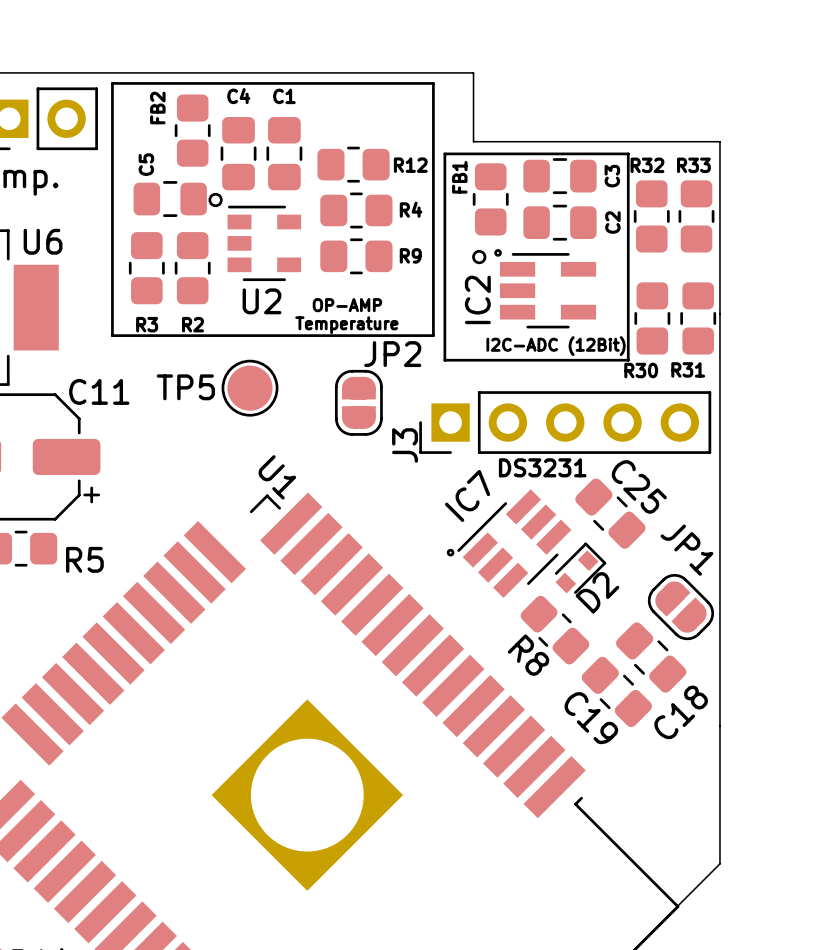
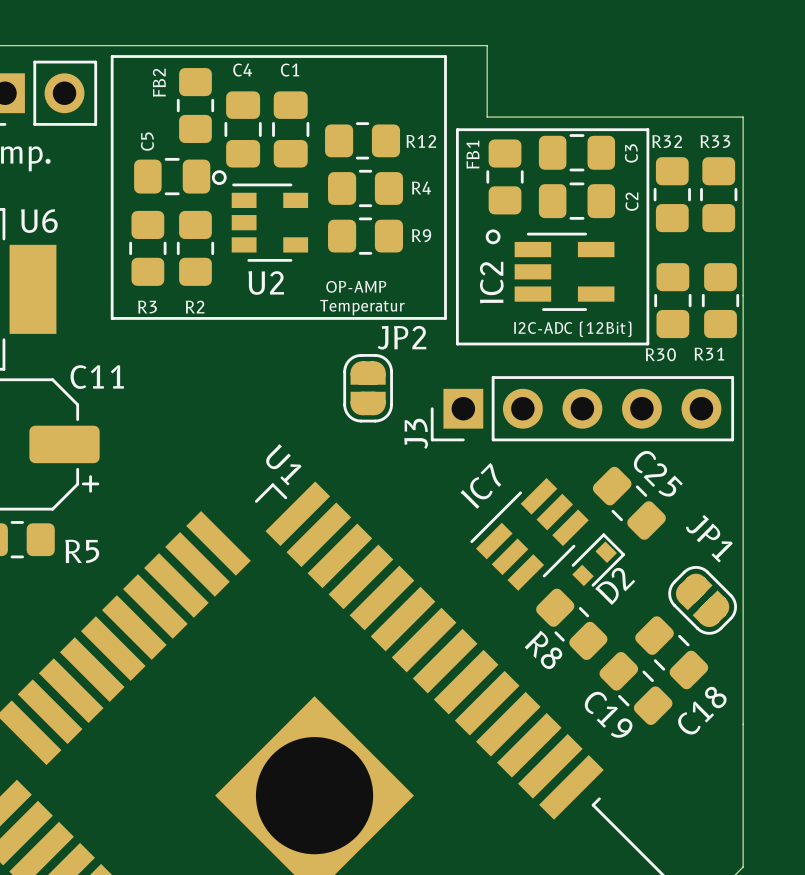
drawing: [494, 249, 502, 257] -> none
text: Temperature (346, 325) -> Temperatur (362, 307)
TP5: (250, 388) -> none
text: DS3231 (542, 467) -> none
drawing: [446, 548, 455, 557] -> none

